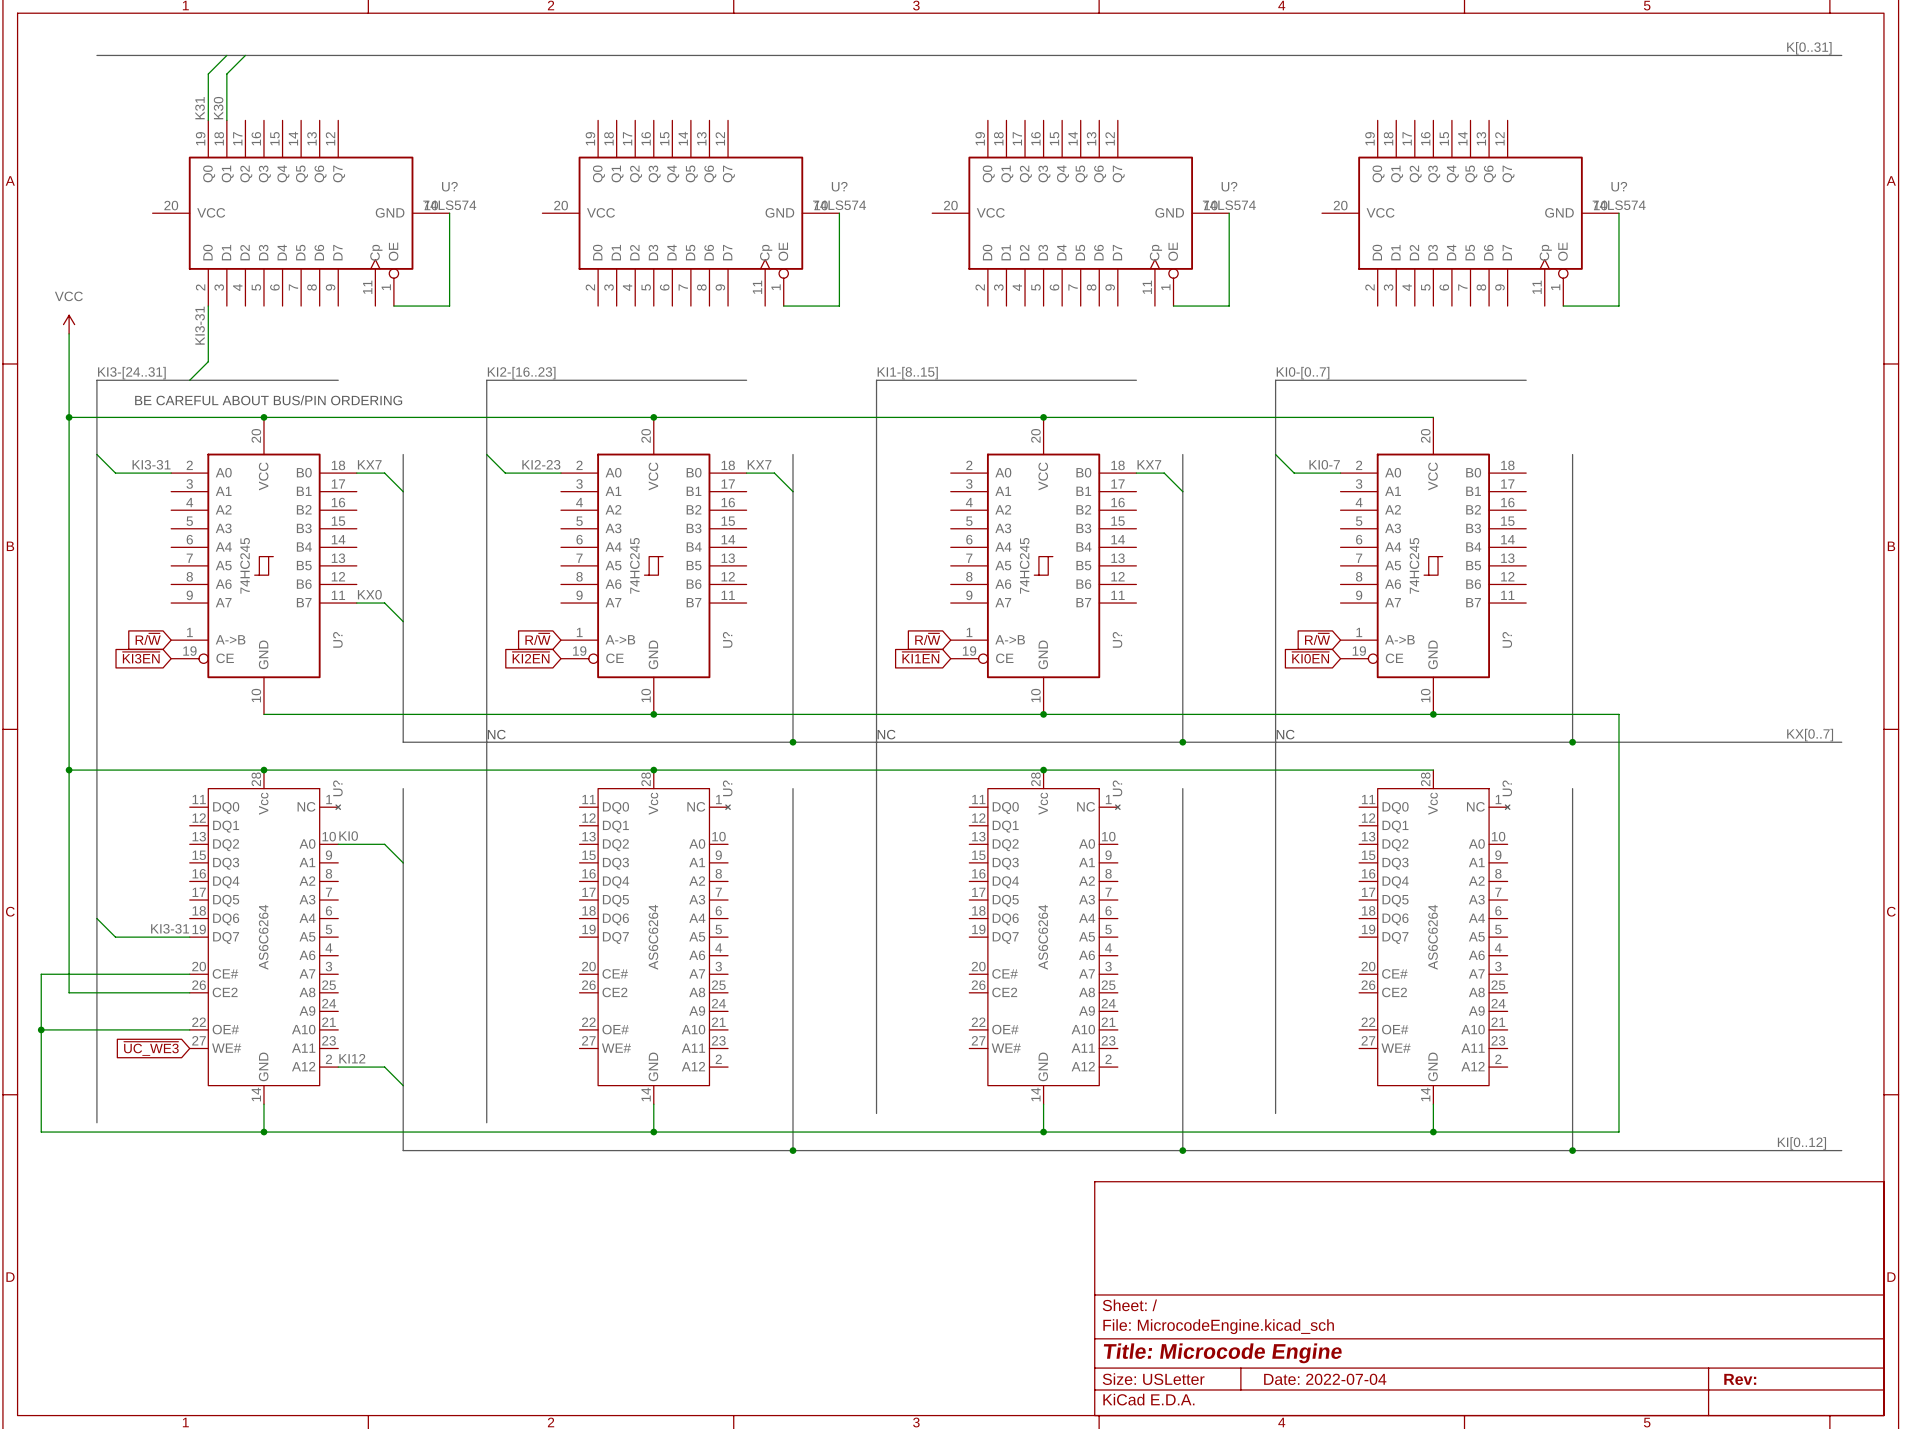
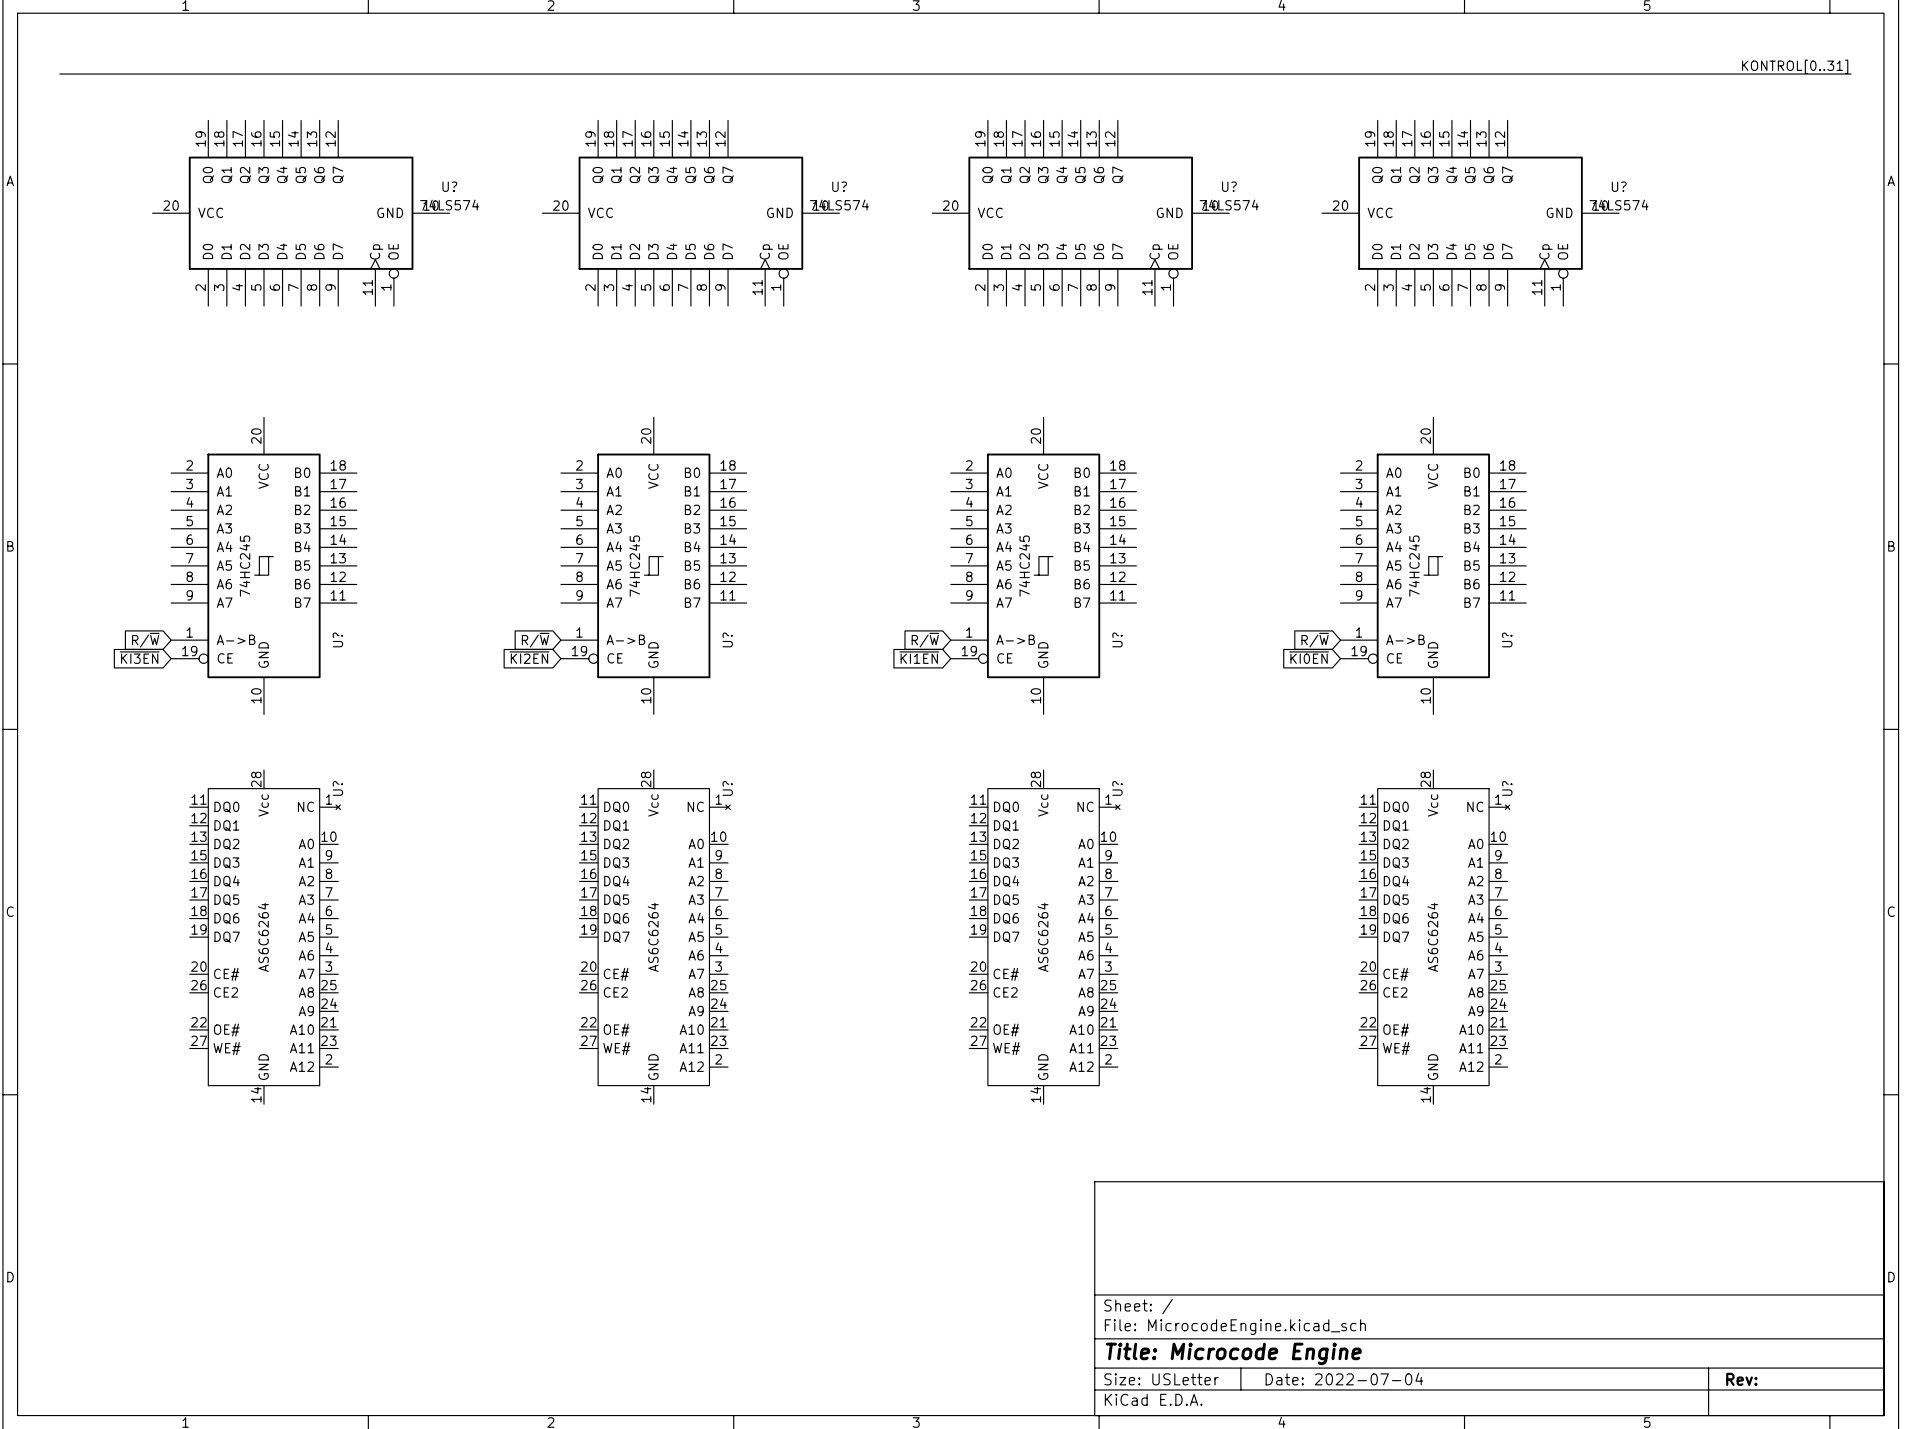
label: K[0..31] (1809, 48) -> KONTROL[0..31] (1795, 66)
bus: (96, 55) (1841, 55) -> none
wire: (226, 55) (208, 74) (208, 120) -> none
wire: (245, 55) (226, 74) (226, 120) -> none
bus: none -> (59, 74) (1851, 74)
label: K31 (200, 108) -> none
label: K30 (218, 108) -> none
wire: (449, 213) (449, 306) (393, 306) -> none
wire: (839, 213) (839, 306) (783, 306) -> none
wire: (1229, 213) (1229, 306) (1173, 306) -> none
wire: (1618, 213) (1618, 306) (1563, 306) -> none
wire: (208, 306) (208, 361) (189, 380) -> none
power symbol: VCC (69, 324) -> none
label: KI3-31 (200, 325) -> none
wire: (69, 333) (69, 992) (189, 992) -> none
label: KI3-[24..31] (131, 373) -> none
label: KI2-[16..23] (521, 373) -> none
label: KI1-[8..15] (907, 373) -> none
label: KI0-[0..7] (1303, 373) -> none
bus: (338, 380) (96, 380) (96, 1122) -> none
bus: (746, 380) (486, 380) (486, 1122) -> none
bus: (1136, 380) (876, 380) (876, 1113) -> none
bus: (1526, 380) (1275, 380) (1275, 1113) -> none
text: BE CAREFUL ABOUT BUS/PIN ORDERING (268, 400) -> none
wire: (69, 417) (1433, 417) -> none
junction: (69, 417) -> none
junction: (263, 417) -> none
junction: (653, 417) -> none
junction: (1043, 417) -> none
wire: (96, 454) (115, 473) (171, 473) -> none
bus: (403, 454) (403, 742) (1841, 742) -> none
wire: (486, 454) (505, 473) (560, 473) -> none
bus: (793, 454) (793, 742) -> none
bus: (1182, 454) (1182, 742) -> none
wire: (1275, 454) (1294, 473) (1340, 473) -> none
bus: (1572, 454) (1572, 742) -> none
label: KI3-31 (151, 464) -> none
label: KX7 (369, 464) -> none
label: KI2-23 (541, 464) -> none
label: KX7 (759, 464) -> none
label: KX7 (1149, 464) -> none
label: KI0-7 (1324, 464) -> none
wire: (356, 473) (384, 473) (403, 491) -> none
wire: (746, 473) (774, 473) (793, 491) -> none
wire: (1136, 473) (1164, 473) (1182, 491) -> none
label: KX0 (369, 594) -> none
wire: (356, 603) (384, 603) (403, 621) -> none
wire: (263, 714) (1618, 714) (1618, 1132) (41, 1132) (41, 974) (189, 974) -> none
junction: (653, 714) -> none
junction: (1043, 714) -> none
junction: (1433, 714) -> none
text: NC (496, 734) -> none
text: NC (886, 734) -> none
text: NC (1285, 734) -> none
label: KX[0..7] (1810, 735) -> none
junction: (793, 742) -> none
junction: (1182, 742) -> none
junction: (1572, 742) -> none
wire: (69, 770) (1433, 770) -> none
junction: (69, 770) -> none
junction: (263, 770) -> none
junction: (653, 770) -> none
junction: (1043, 770) -> none
bus: (403, 788) (403, 1150) (1841, 1150) -> none
bus: (793, 788) (793, 1150) -> none
bus: (1182, 788) (1182, 1150) -> none
bus: (1572, 788) (1572, 1150) -> none
label: KI0 (348, 836) -> none
wire: (338, 844) (384, 844) (403, 862) -> none
wire: (96, 918) (115, 937) (189, 937) -> none
label: KI3-31 (170, 928) -> none
wire: (41, 1029) (189, 1029) -> none
junction: (41, 1029) -> none
global label: ~{UC_WE3} (151, 1048) -> none
label: KI12 (352, 1058) -> none
wire: (338, 1067) (384, 1067) (403, 1085) -> none
wire: (263, 1104) (263, 1132) -> none
wire: (653, 1104) (653, 1132) -> none
wire: (1043, 1104) (1043, 1132) -> none
wire: (1433, 1104) (1433, 1132) -> none
junction: (263, 1132) -> none
junction: (653, 1132) -> none
junction: (1043, 1132) -> none
junction: (1433, 1132) -> none
label: KI[0..12] (1801, 1143) -> none
junction: (793, 1150) -> none
junction: (1182, 1150) -> none
junction: (1572, 1150) -> none

